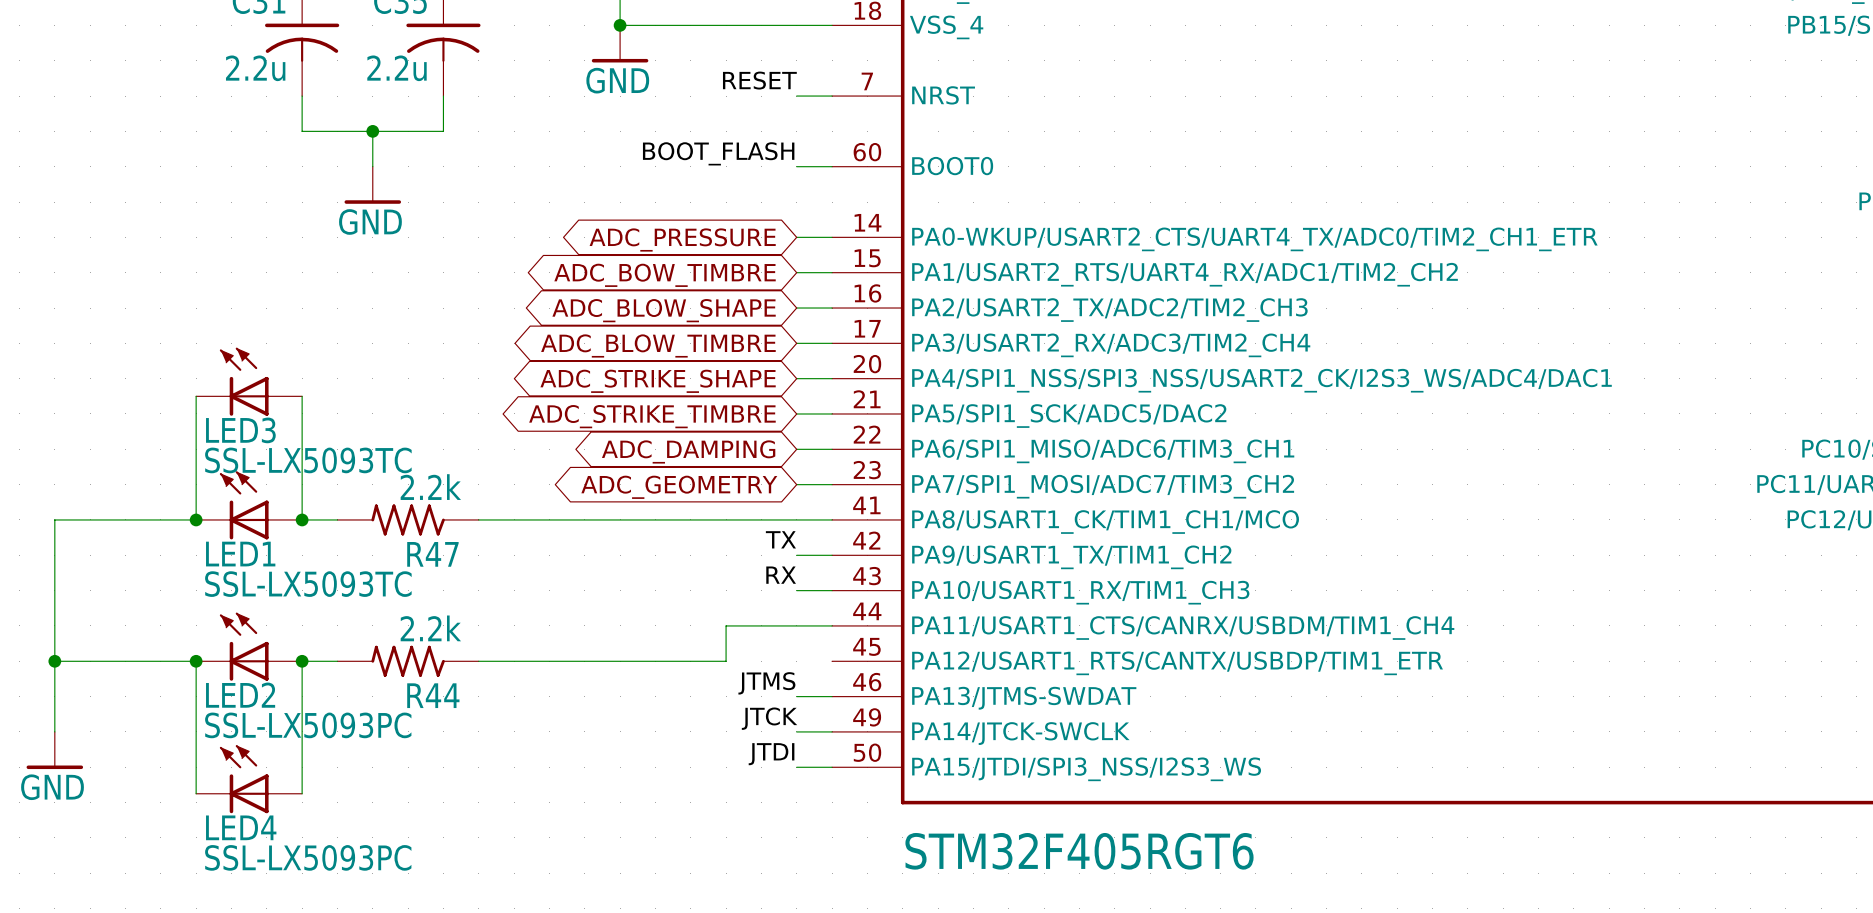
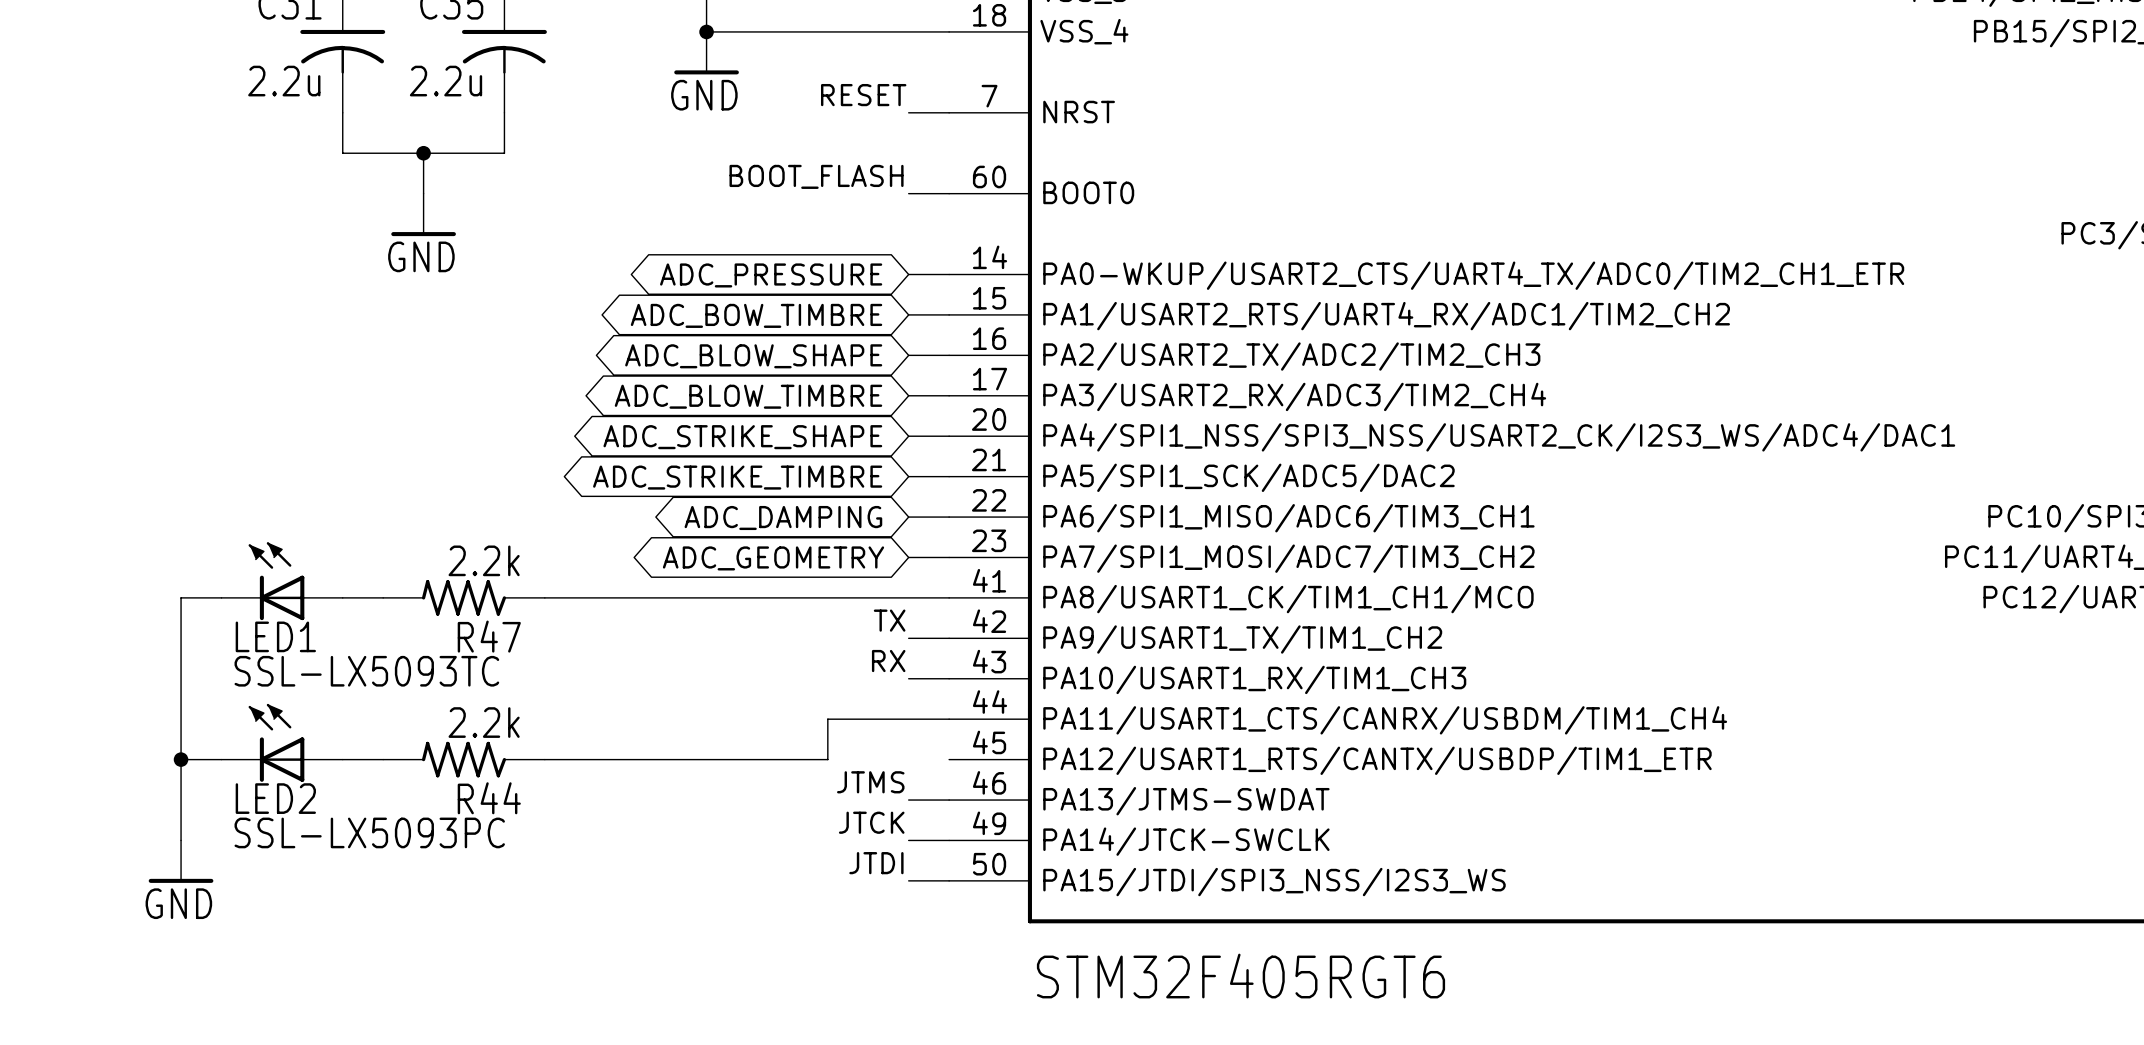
LED3: SSL-LX5093TC (249, 381) -> none
wire: (196, 396) (196, 519) -> none
wire: (302, 396) (302, 519) -> none
wire: (160, 519) (54, 519) (54, 731) -> (181, 597) (181, 840)
junction: (196, 519) -> none
junction: (302, 519) -> none
wire: (54, 661) (160, 661) -> none
junction: (54, 661) -> none
wire: (196, 661) (196, 793) -> none
junction position: (196, 661) -> (181, 759)
wire: (302, 661) (302, 793) -> none
junction: (302, 661) -> none
power symbol position: GND (54, 750) -> GND (181, 861)
LED4: SSL-LX5093PC (249, 779) -> none

